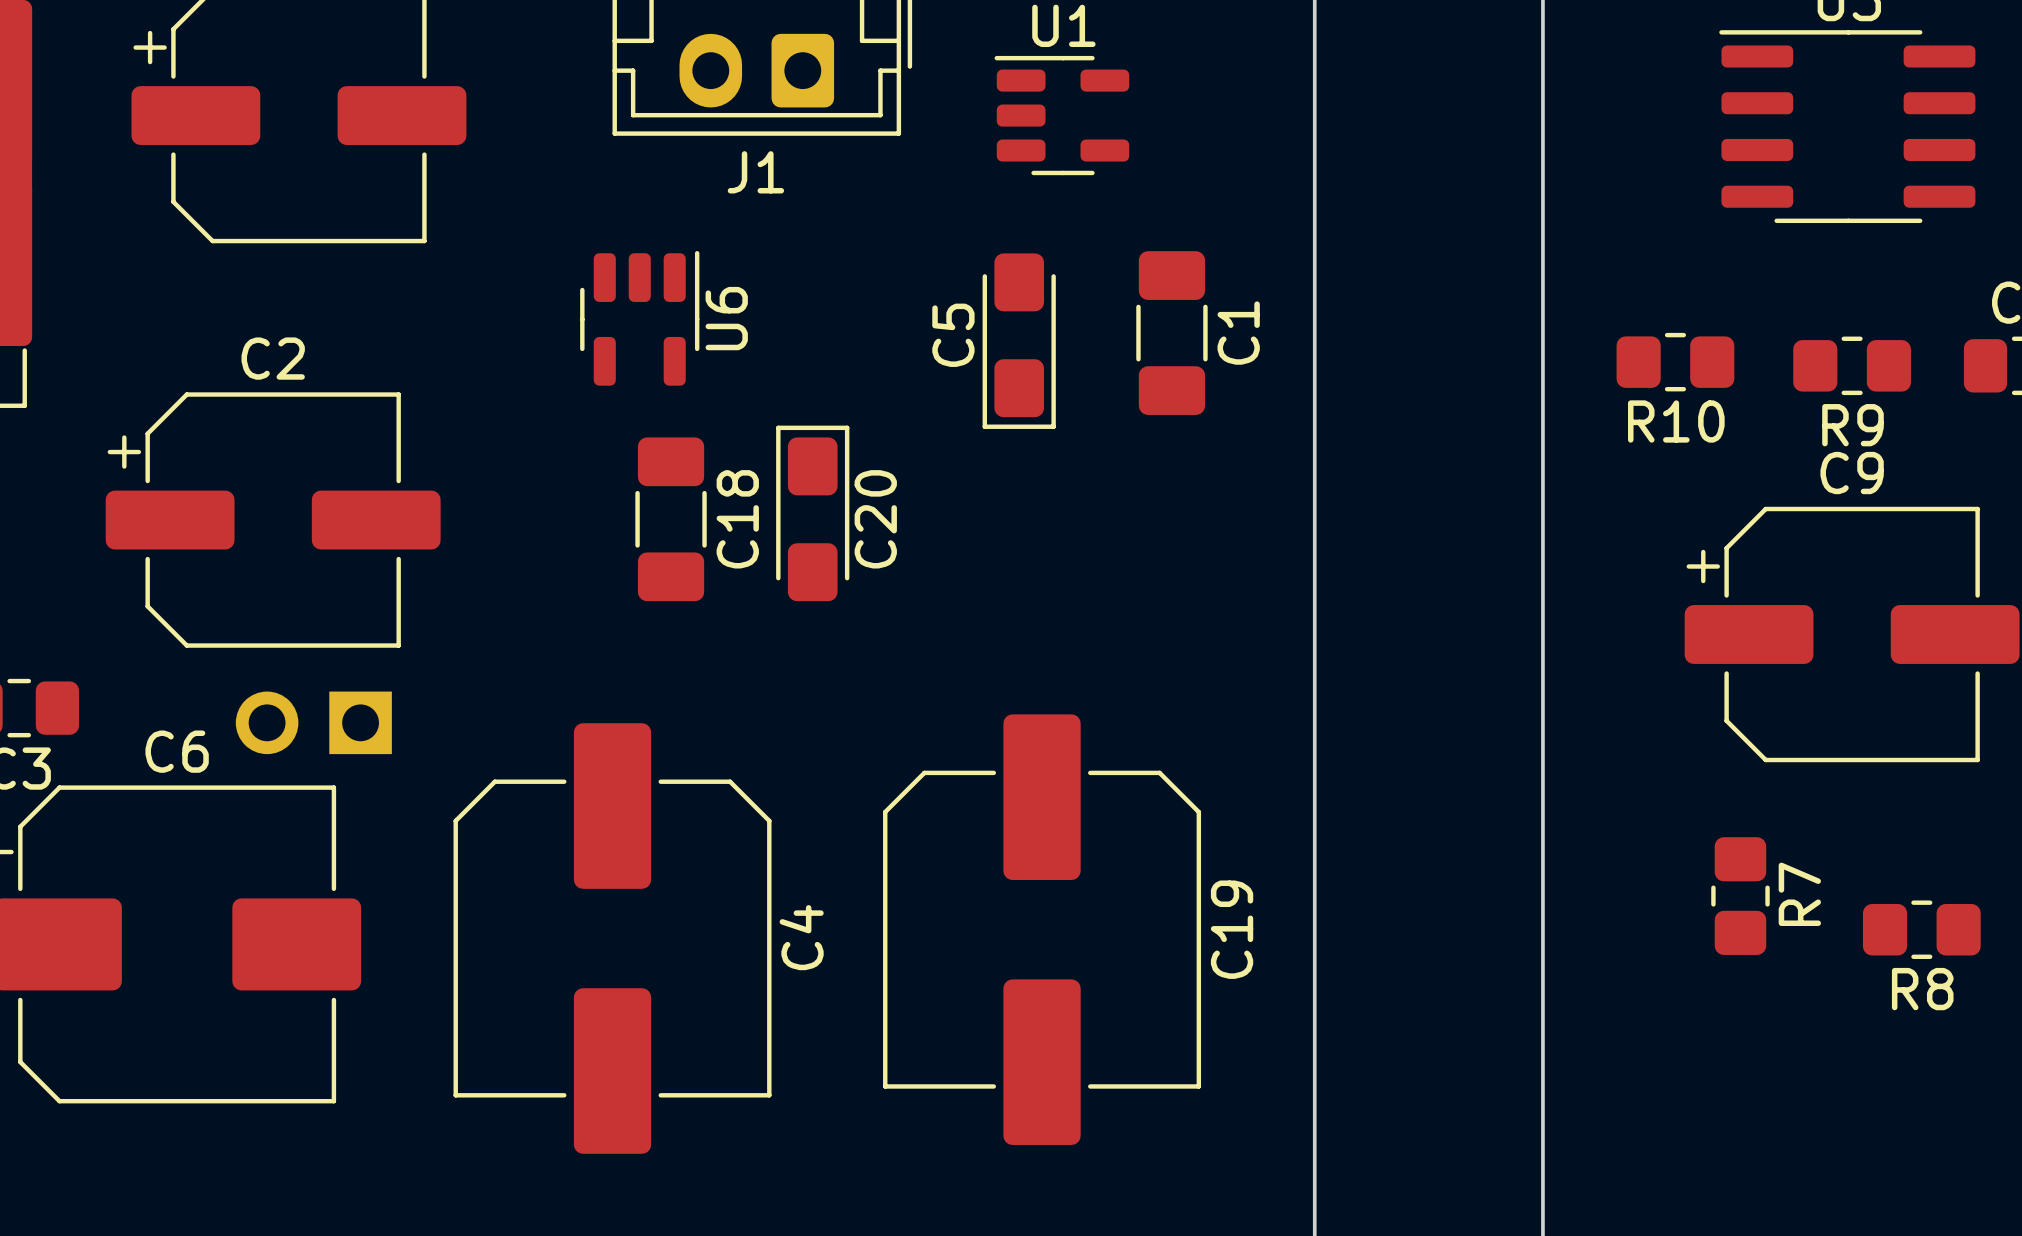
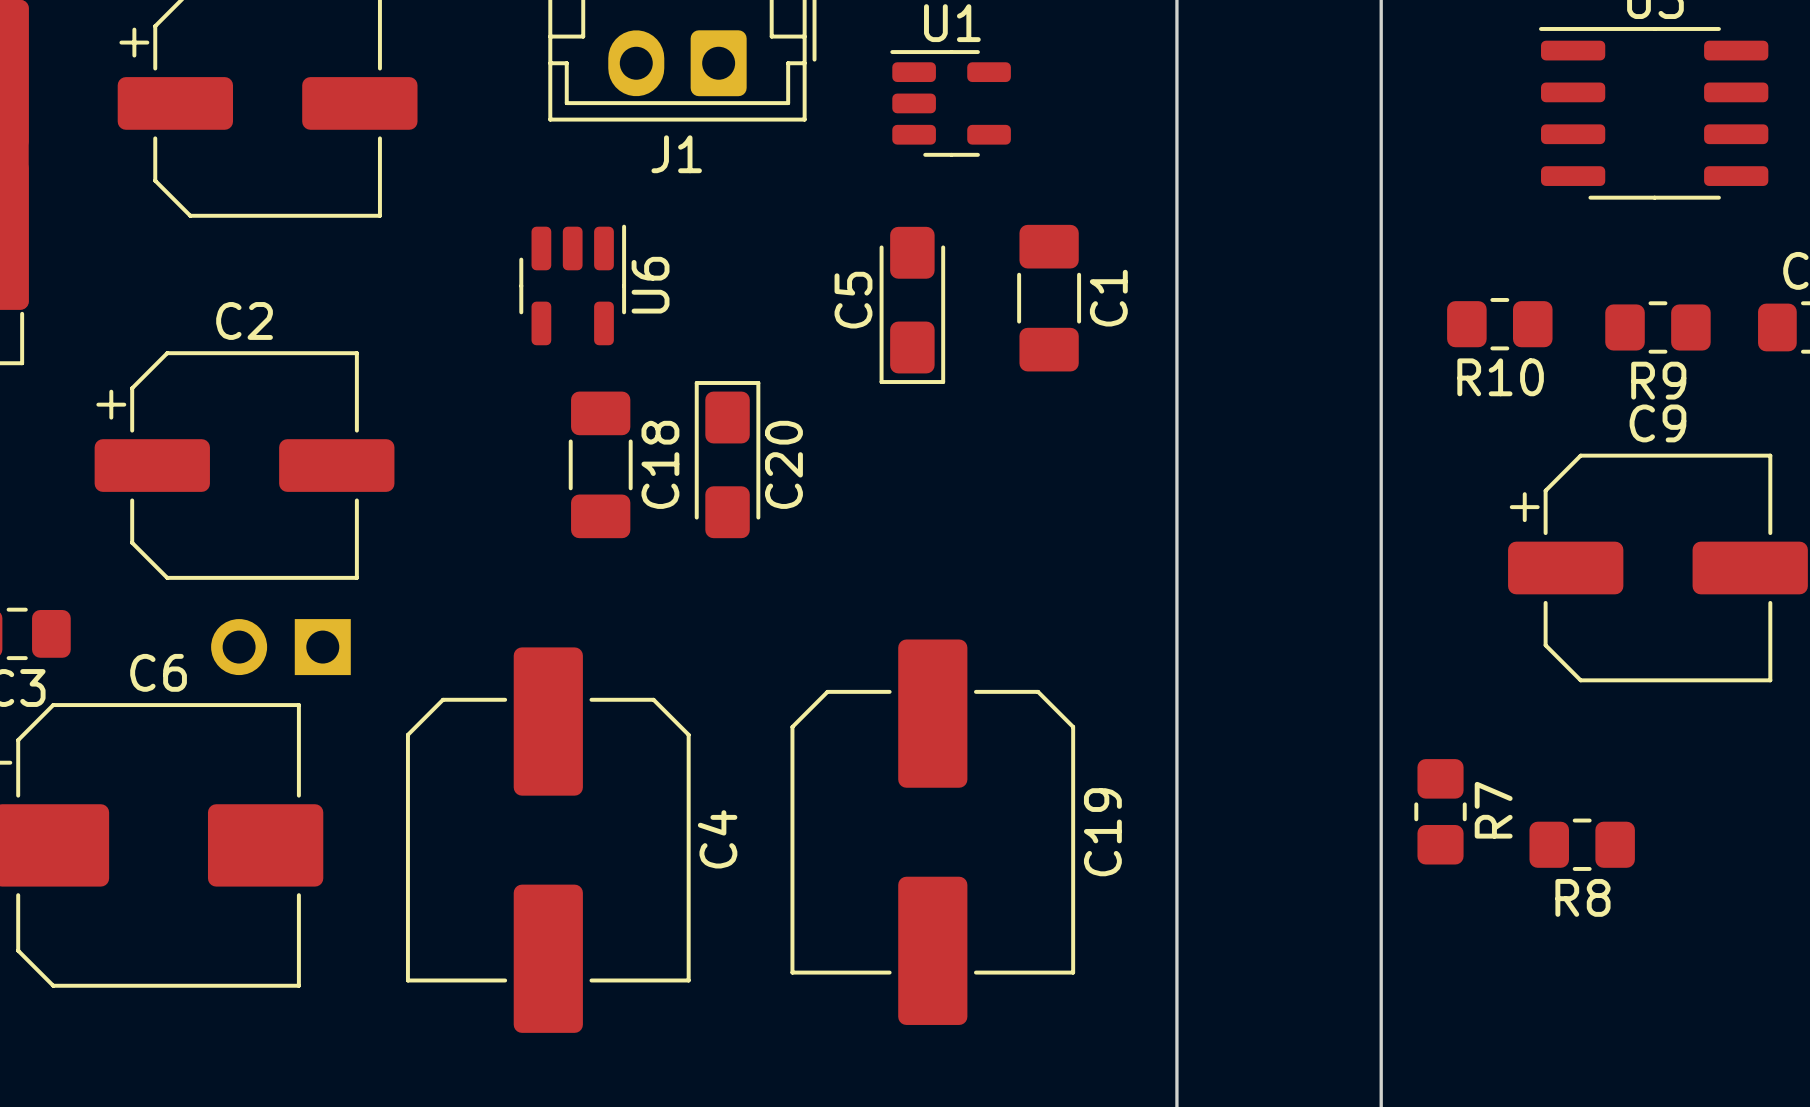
R7 position: (1740, 896) -> (1440, 811)
R8 position: (1921, 929) -> (1582, 844)

